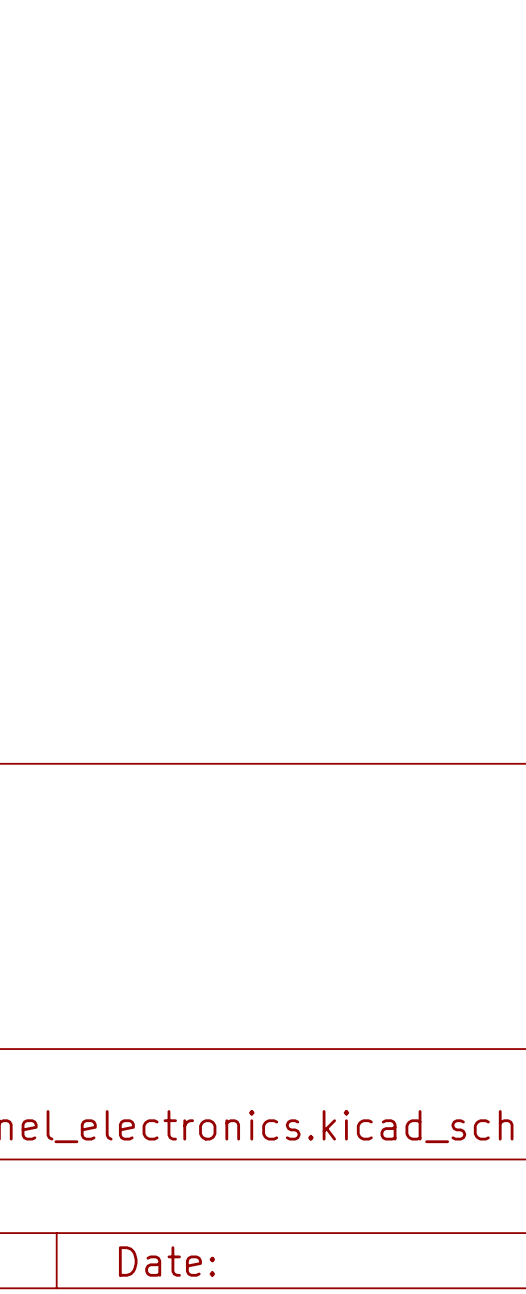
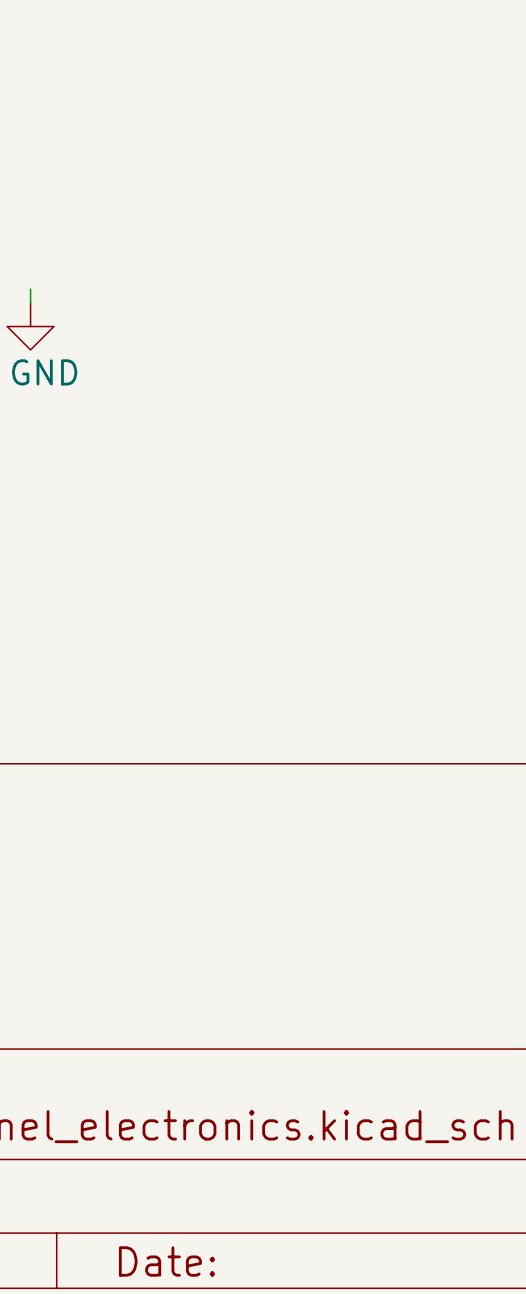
wire: none -> (30, 289) (30, 303)
power symbol: none -> GND (30, 326)

